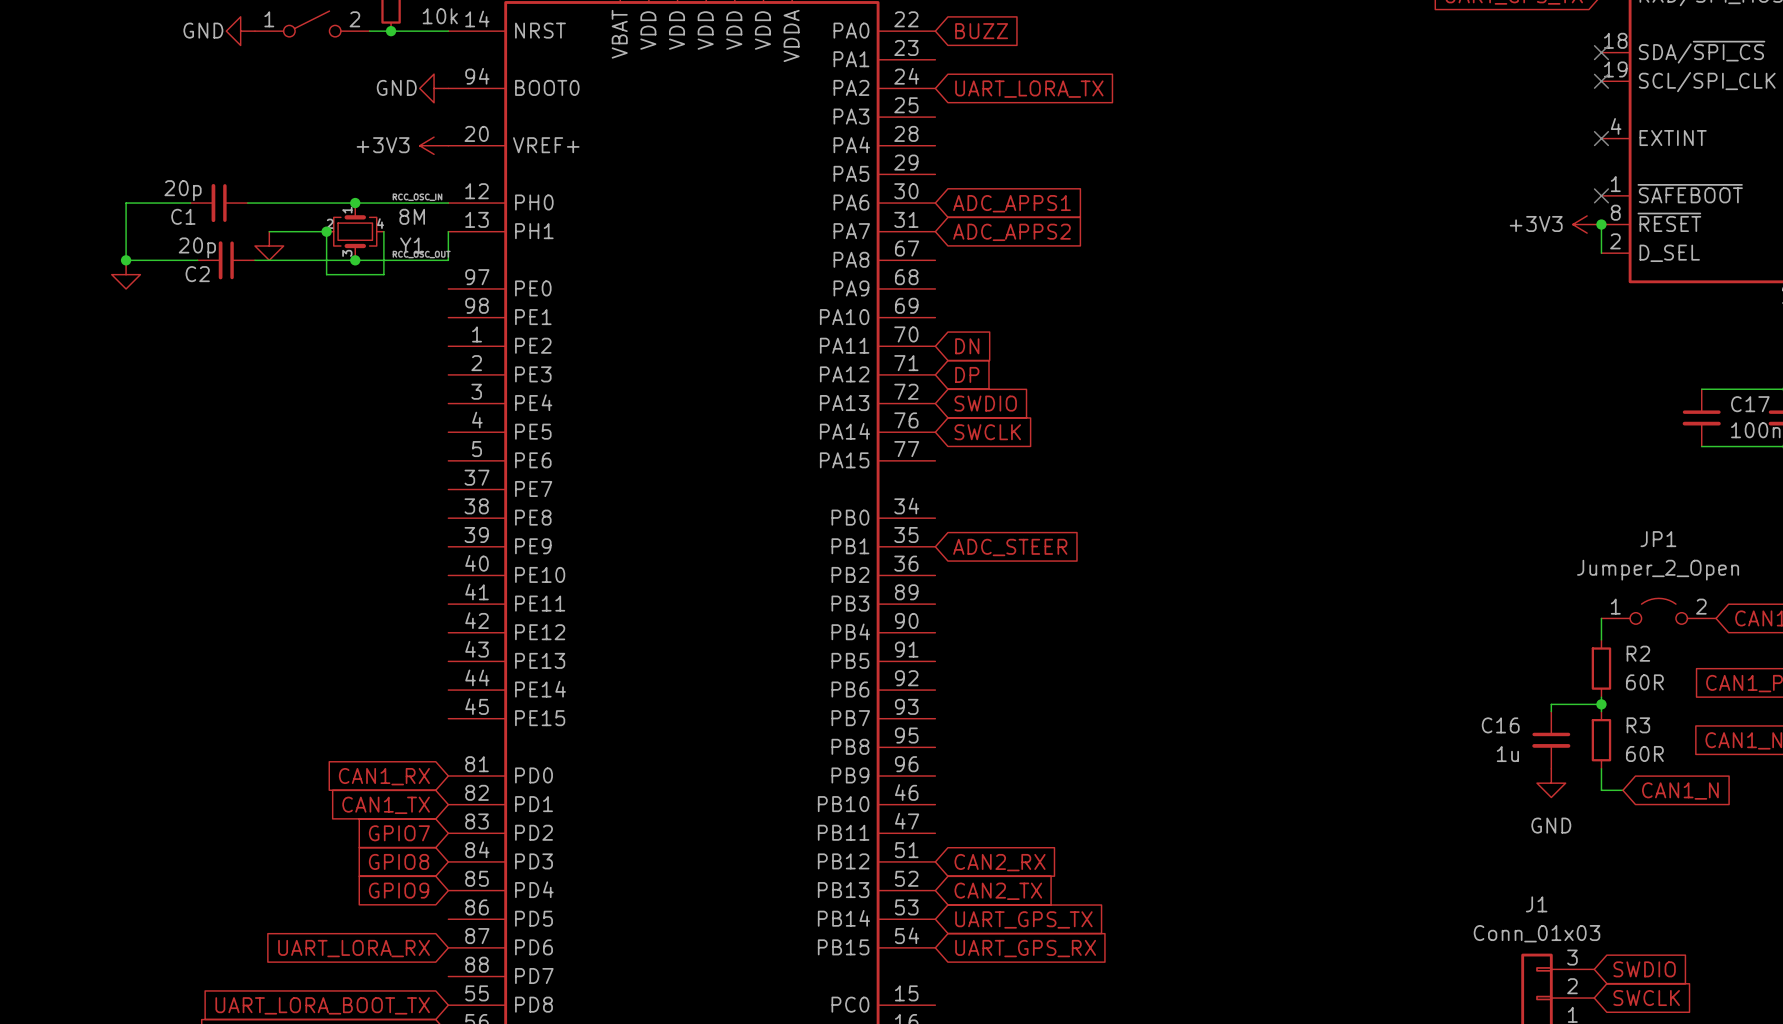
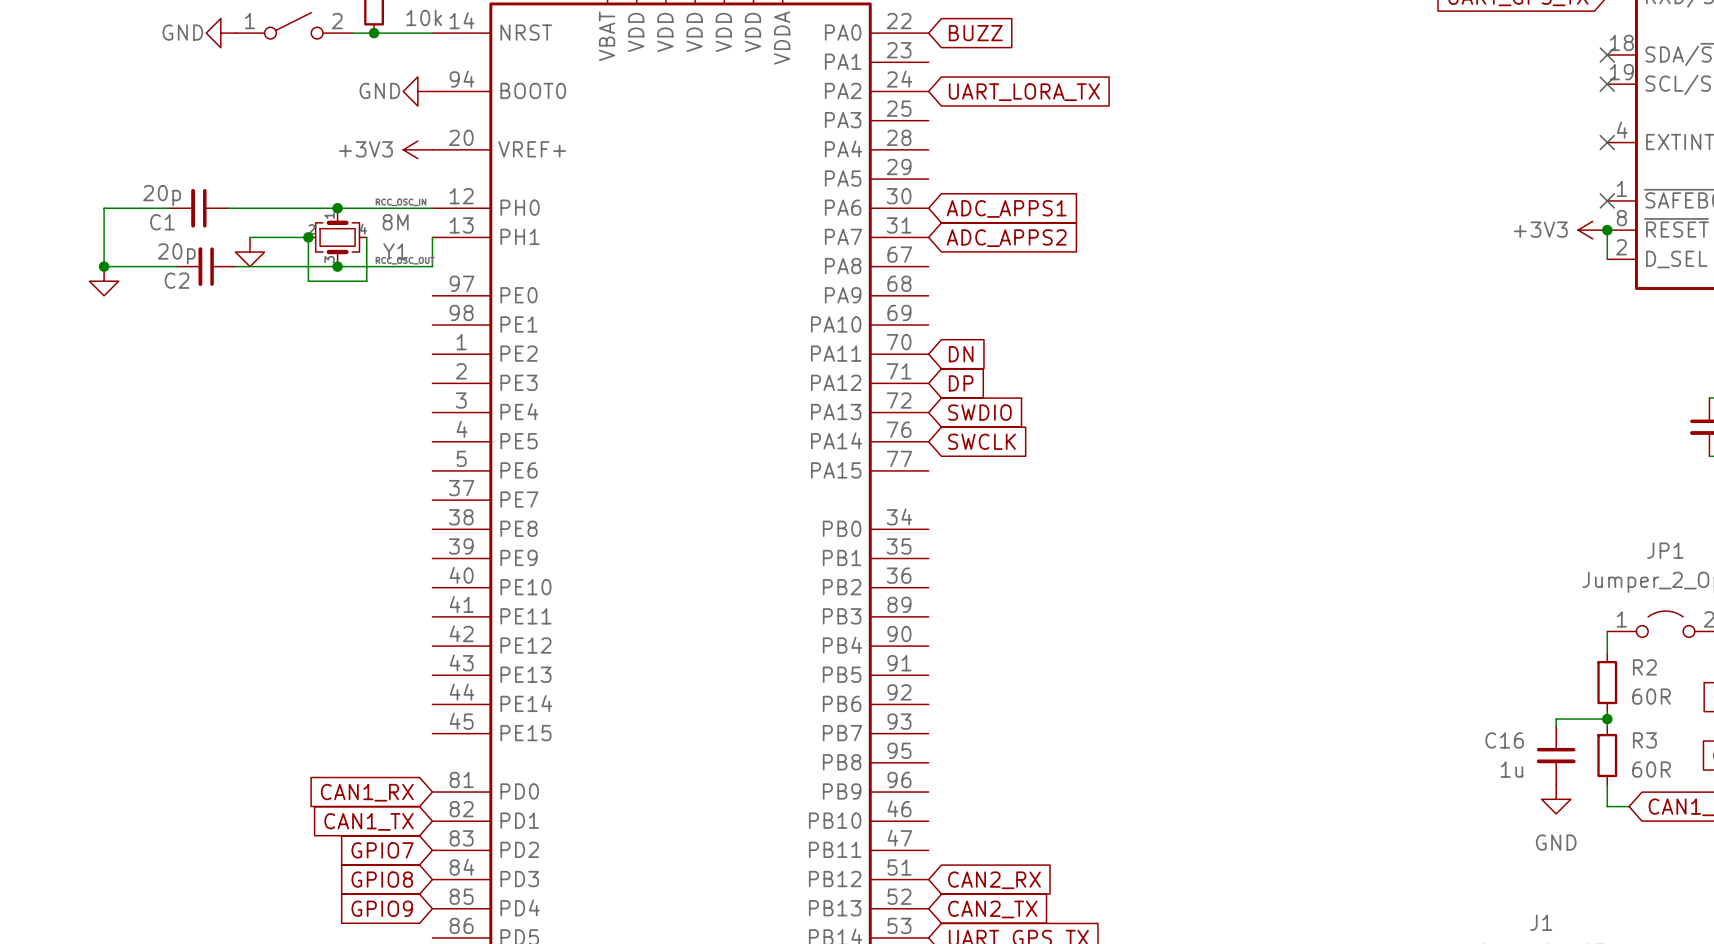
global label: ADC_STEER (1010, 547) -> none

